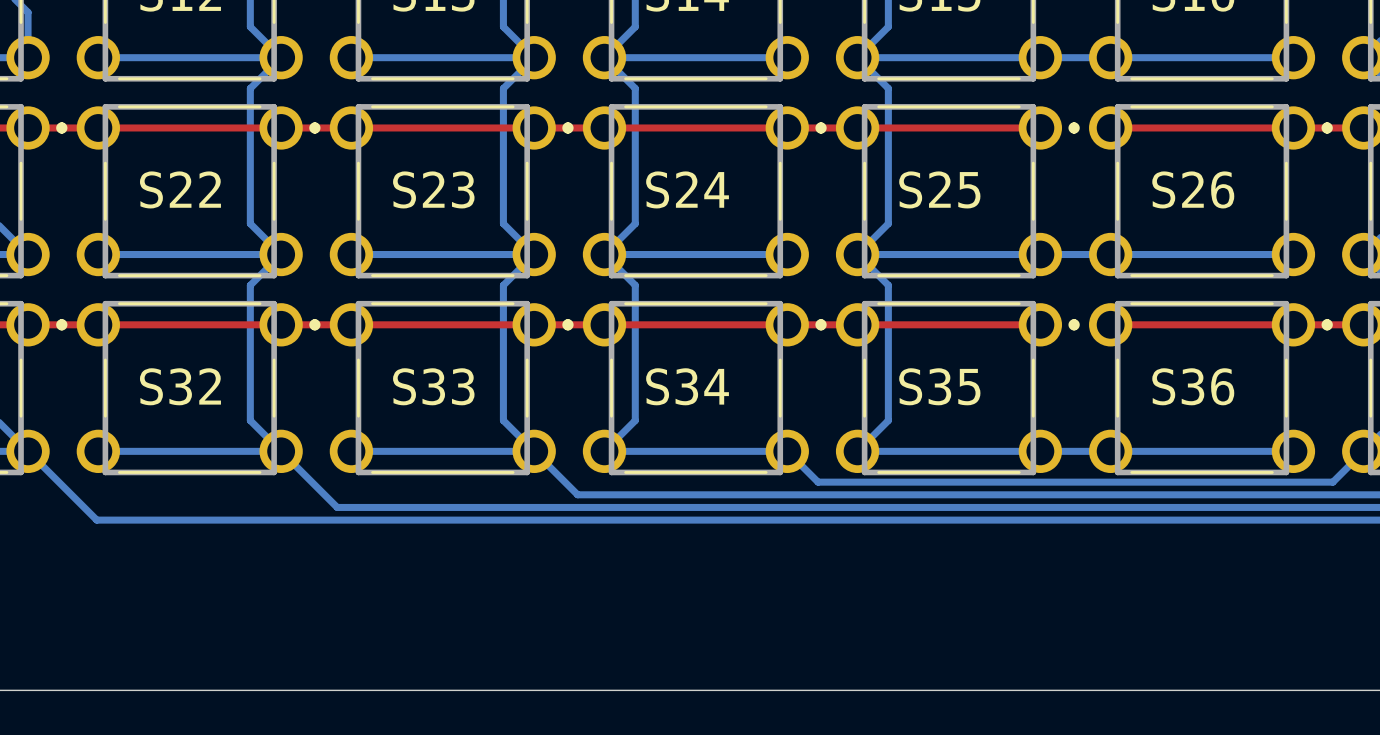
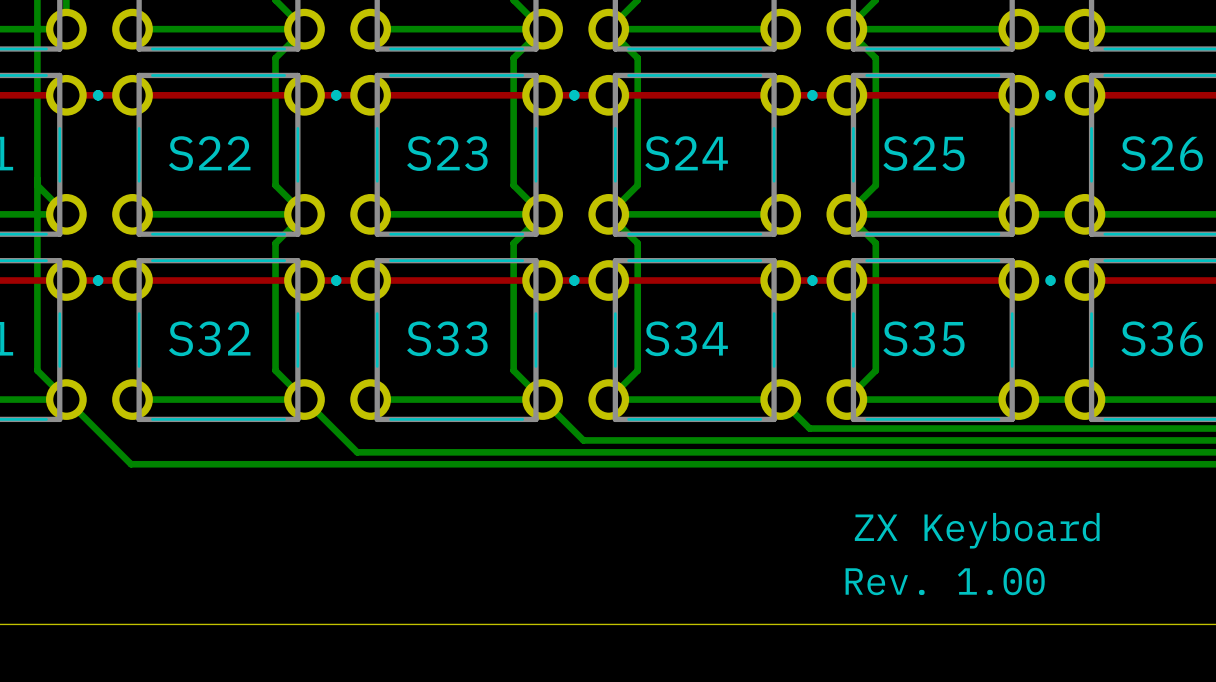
text: none -> ZX Keyboard (977, 530)
text: none -> Rev. 1.00 (945, 581)

